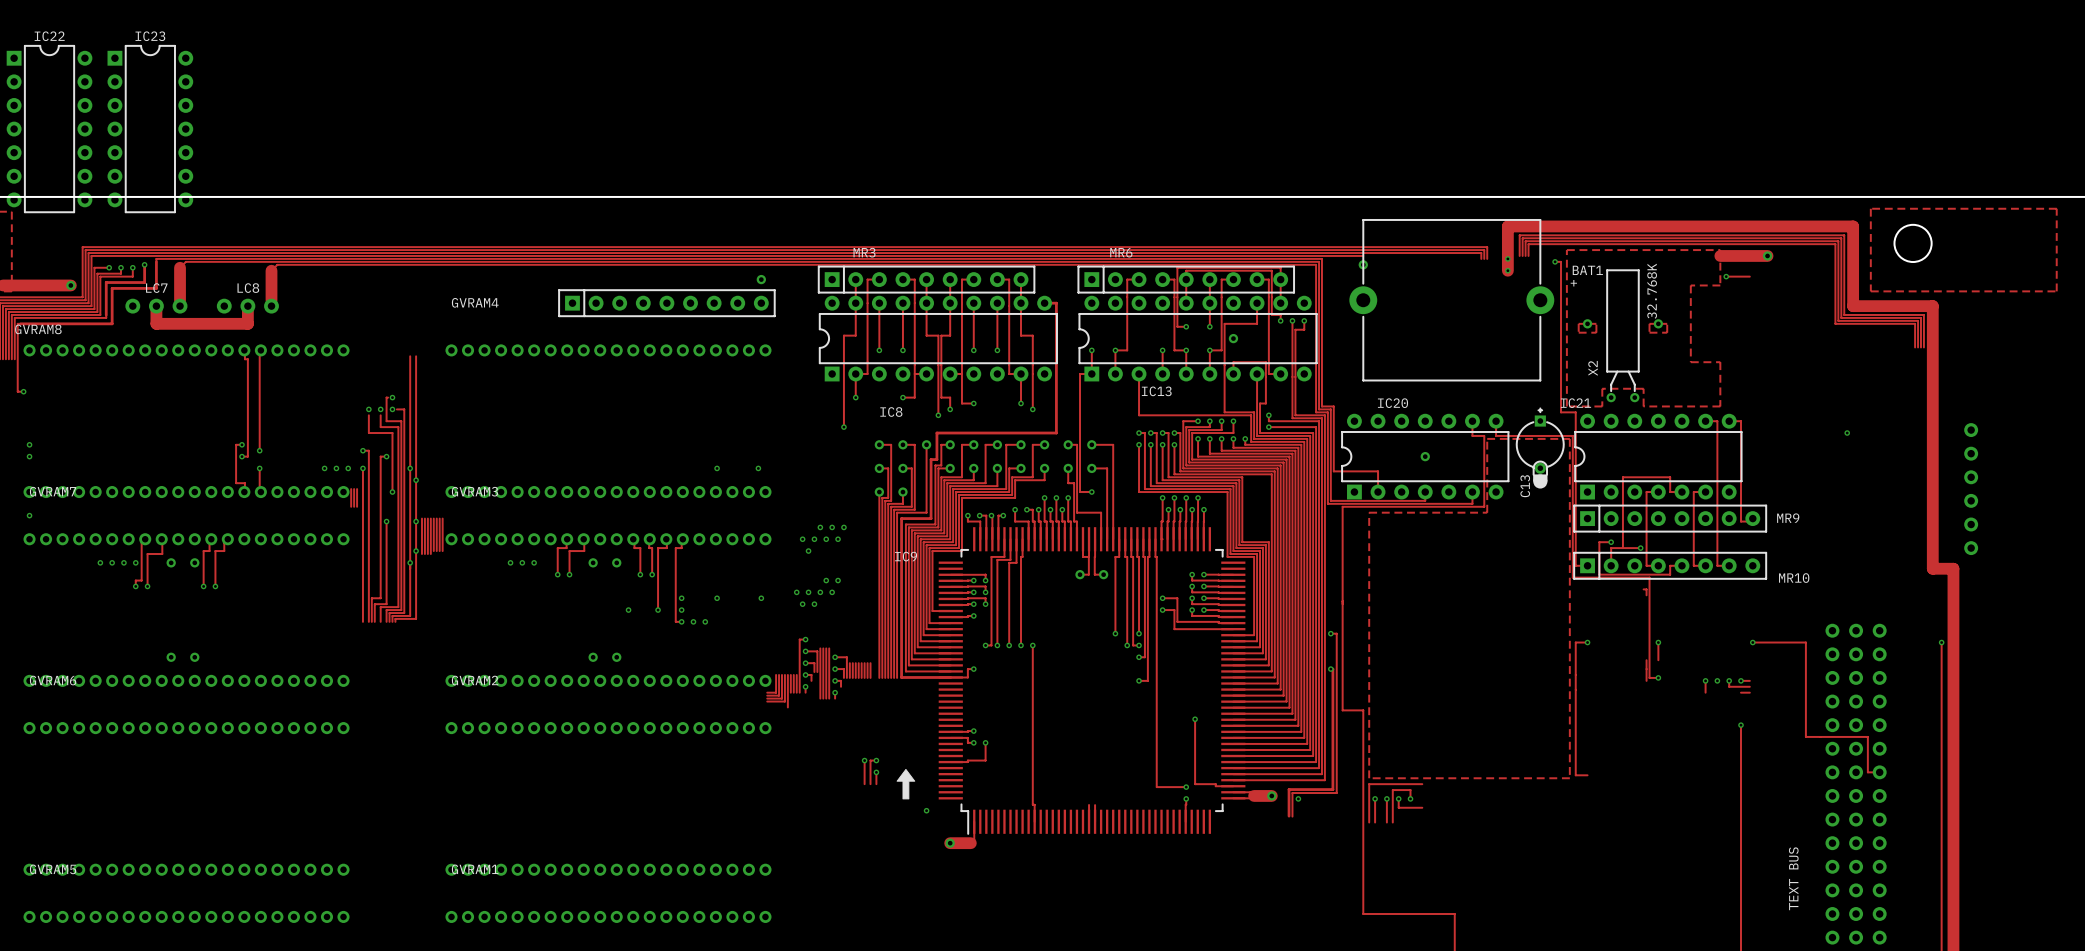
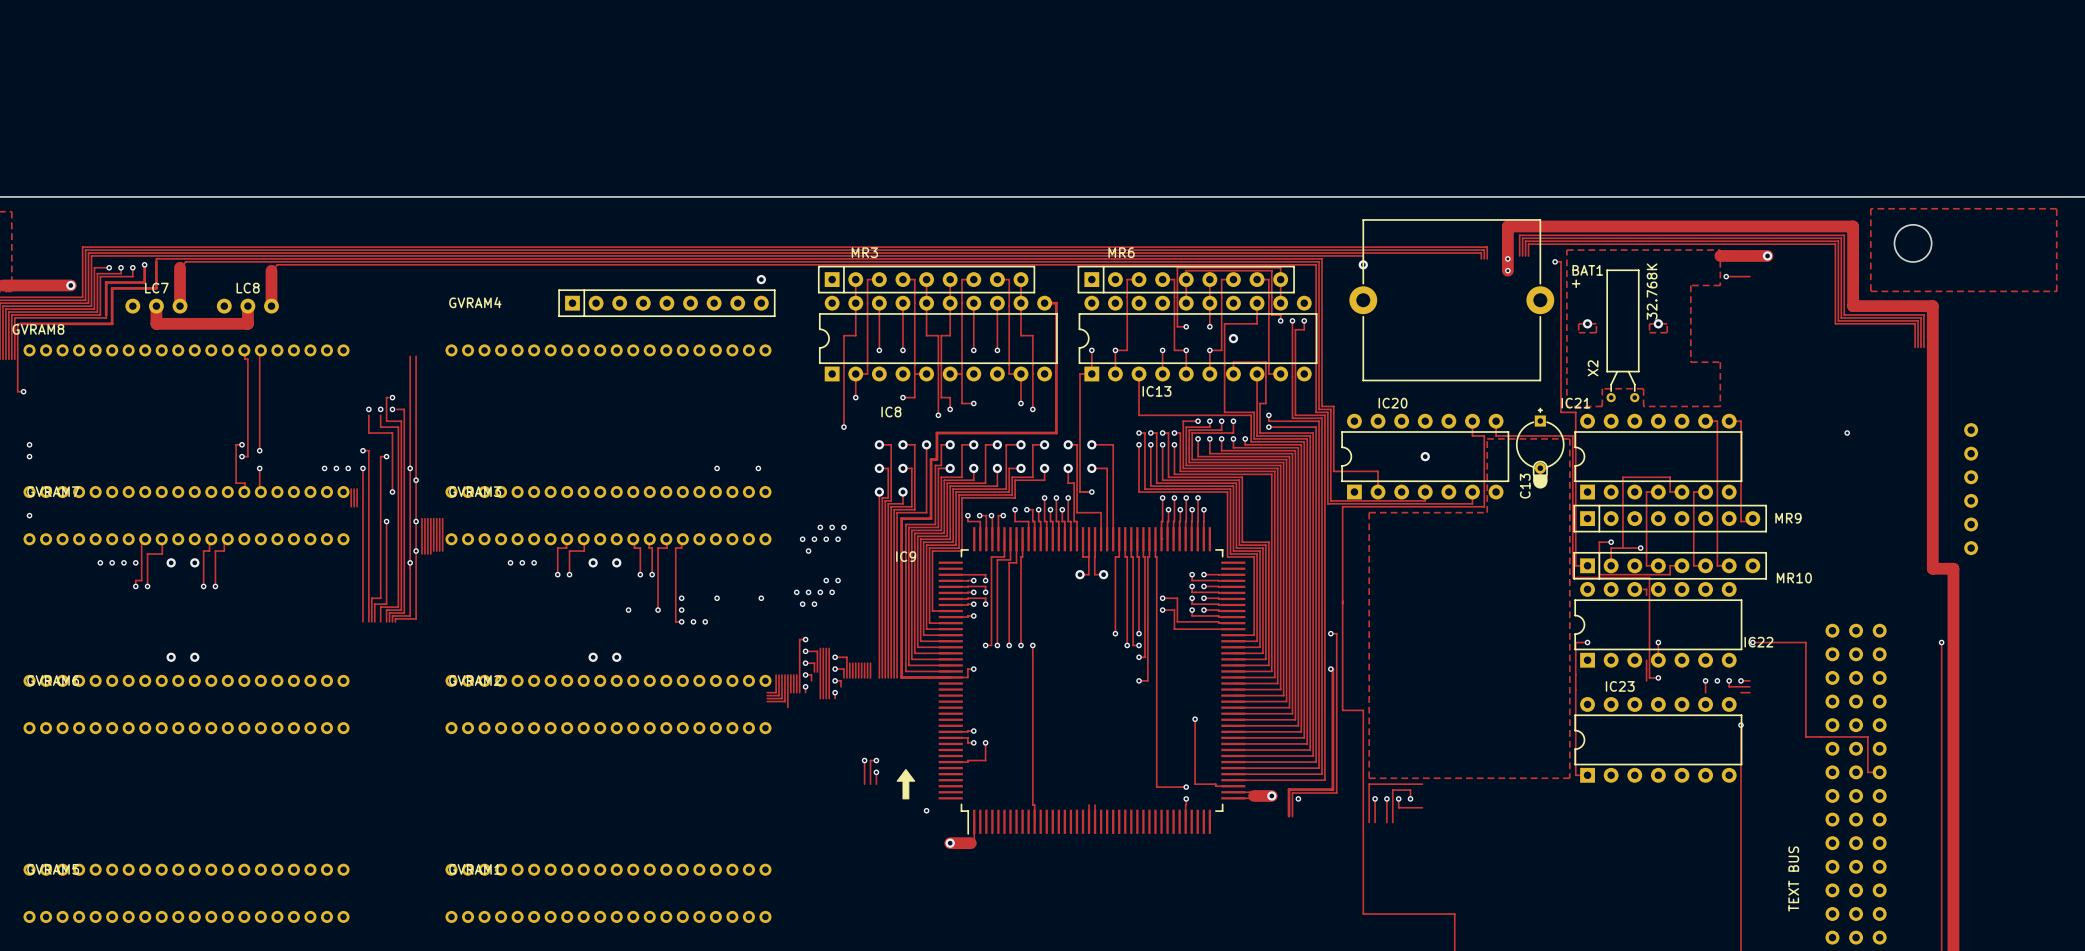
IC22 name position: IC22 (49, 36) -> IC22 (1758, 642)
IC23 name position: IC23 (150, 36) -> IC23 (1620, 686)
IC22 rotation: 0° (49, 129) -> 90° counterclockwise (1658, 624)
IC22 position: (49, 129) -> (1658, 624)
IC23 rotation: 0° (150, 129) -> 90° counterclockwise (1658, 739)
IC23 position: (150, 129) -> (1658, 739)

